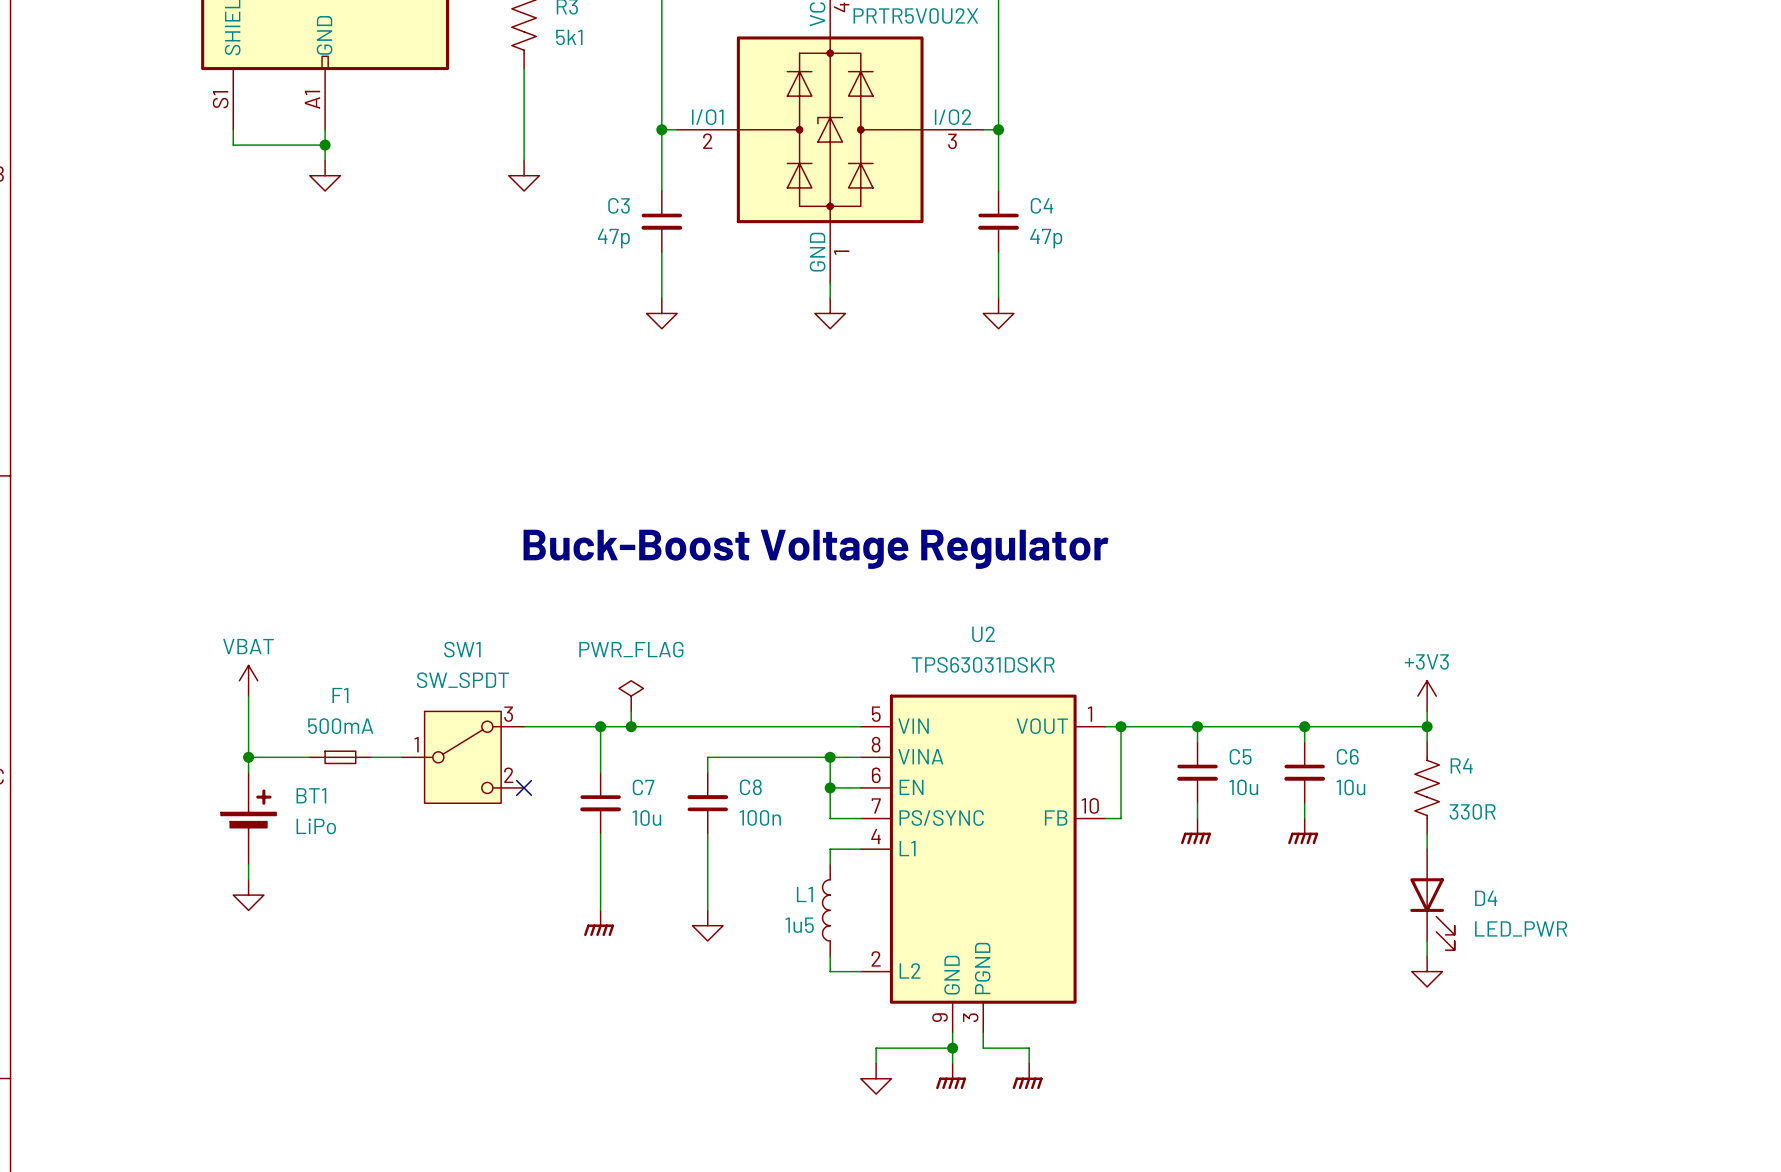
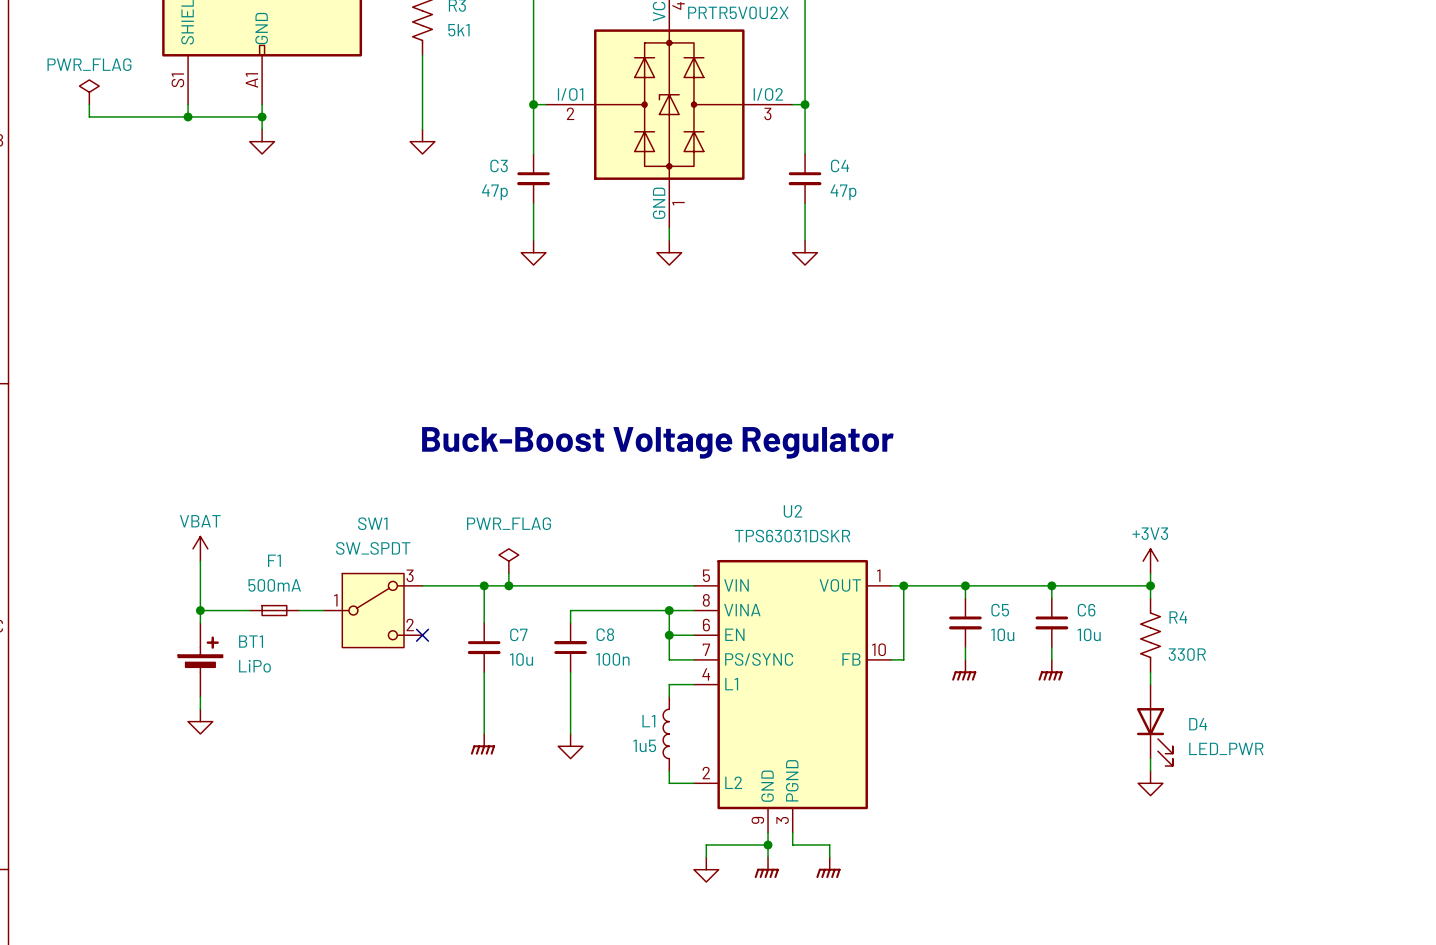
power symbol: none -> PWR_FLAG (89, 92)
wire: none -> (89, 104) (89, 116) (188, 116)
junction: none -> (188, 116)

